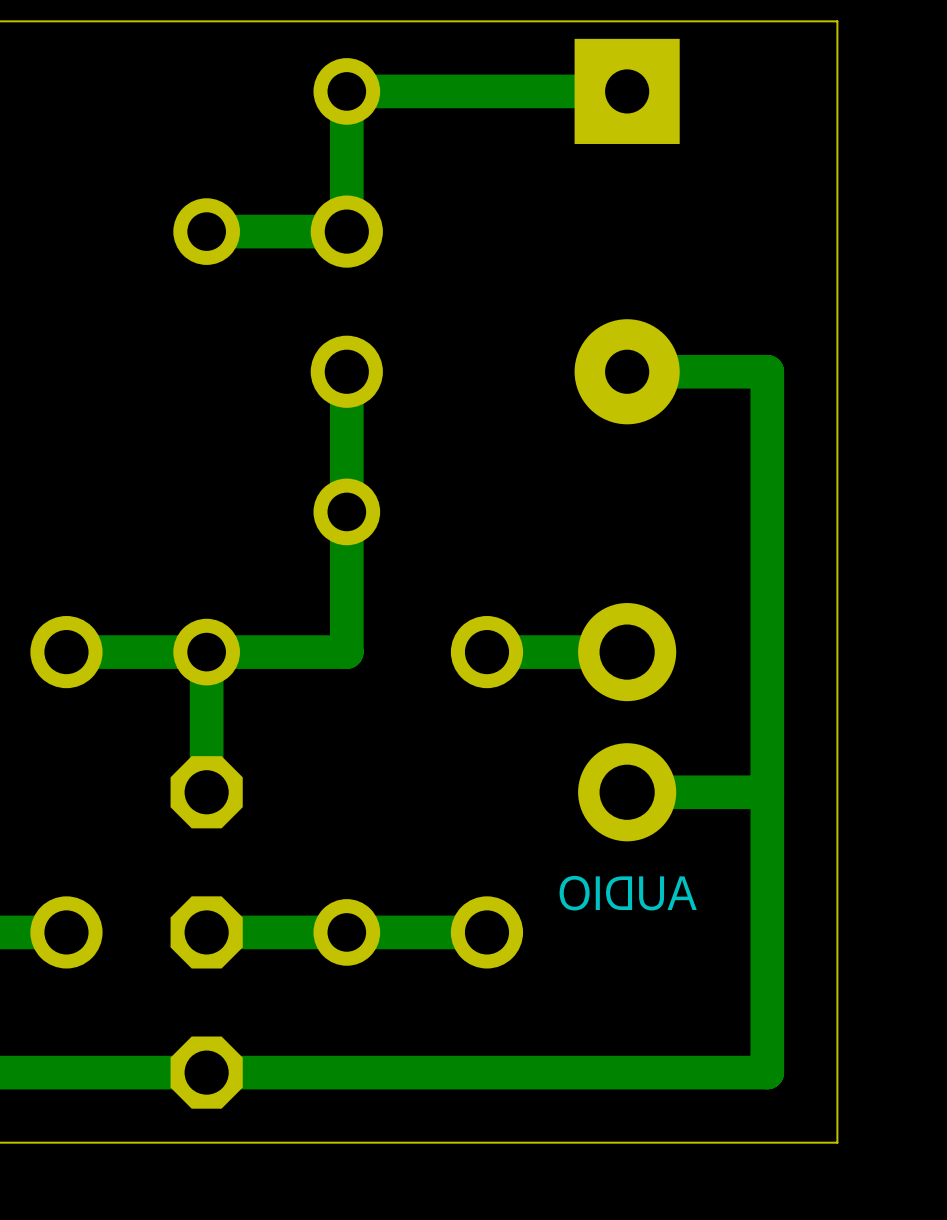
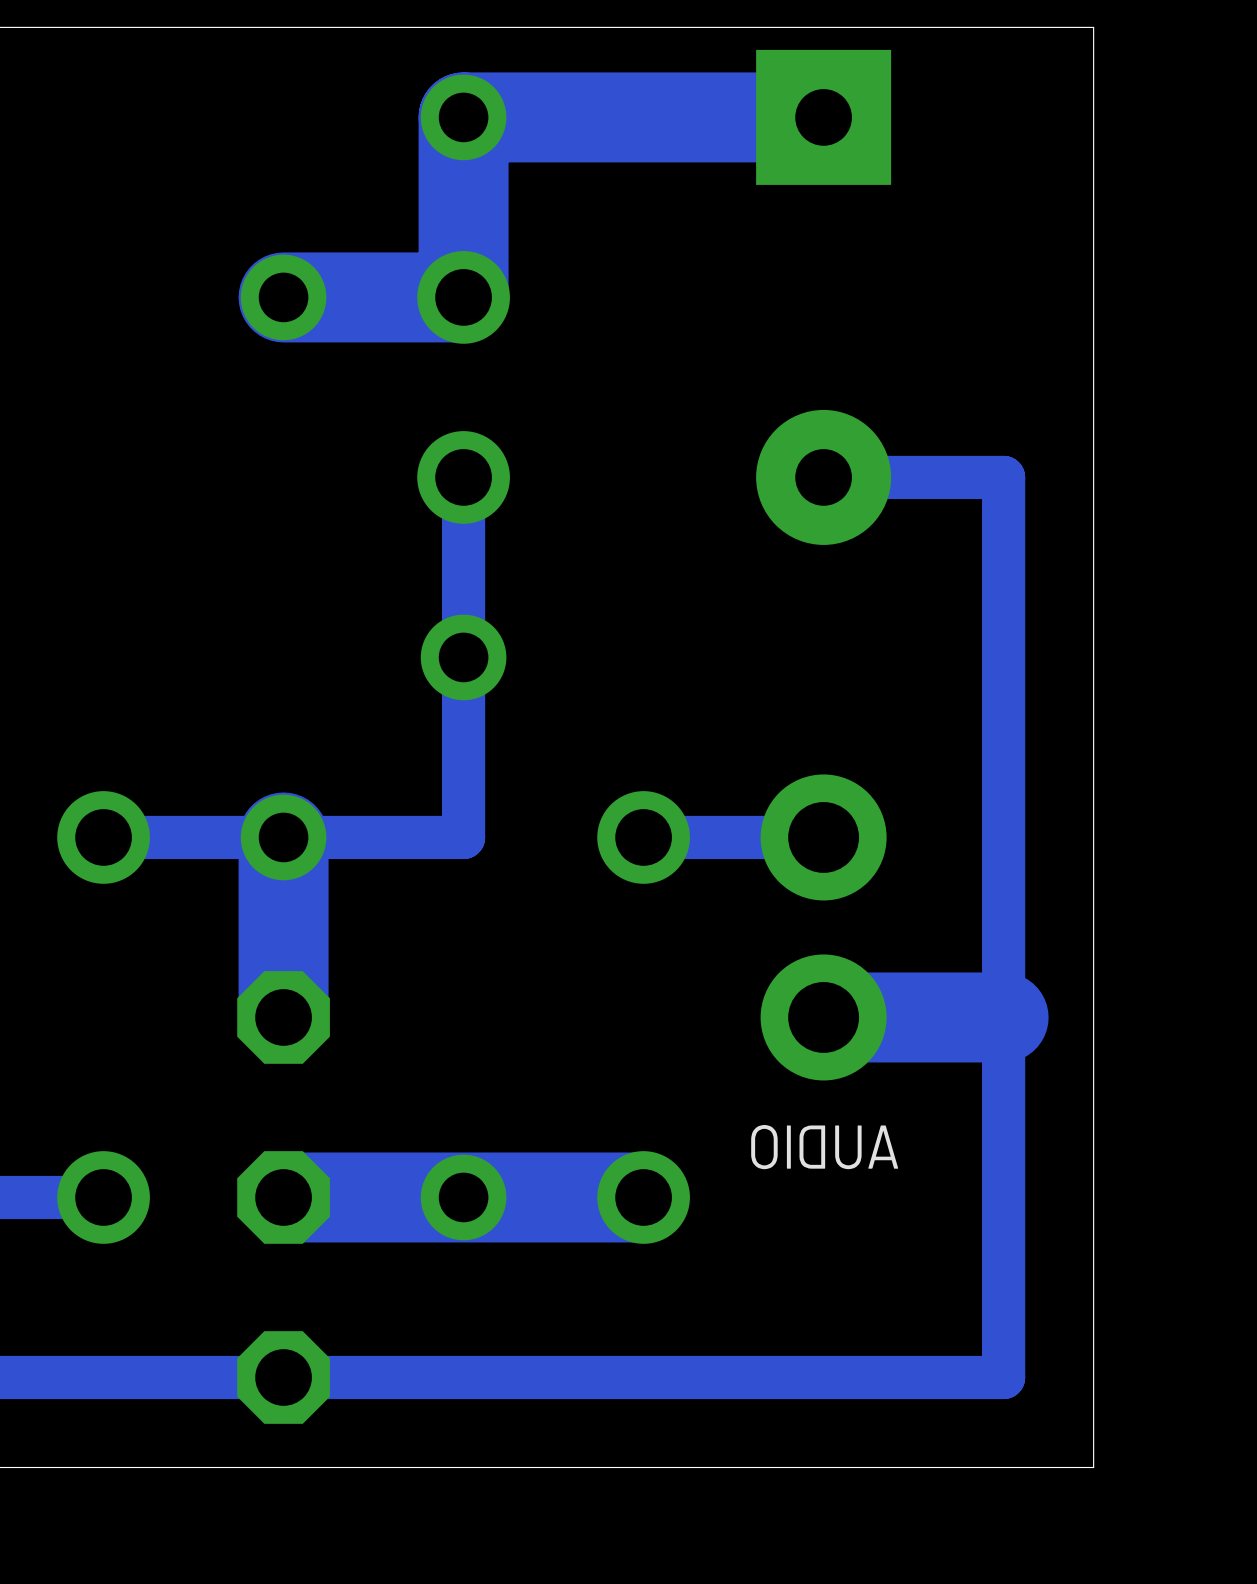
track width: thin (627, 91) (346, 91) (346, 231) (206, 231) -> thick (823, 117) (463, 117) (463, 297) (283, 297)
track width: thin (206, 652) (206, 792) -> thick (283, 837) (283, 1017)
track width: thin (767, 792) (627, 792) -> thick (1003, 1017) (823, 1017)
track width: thin (486, 932) (206, 932) -> thick (643, 1197) (283, 1197)

